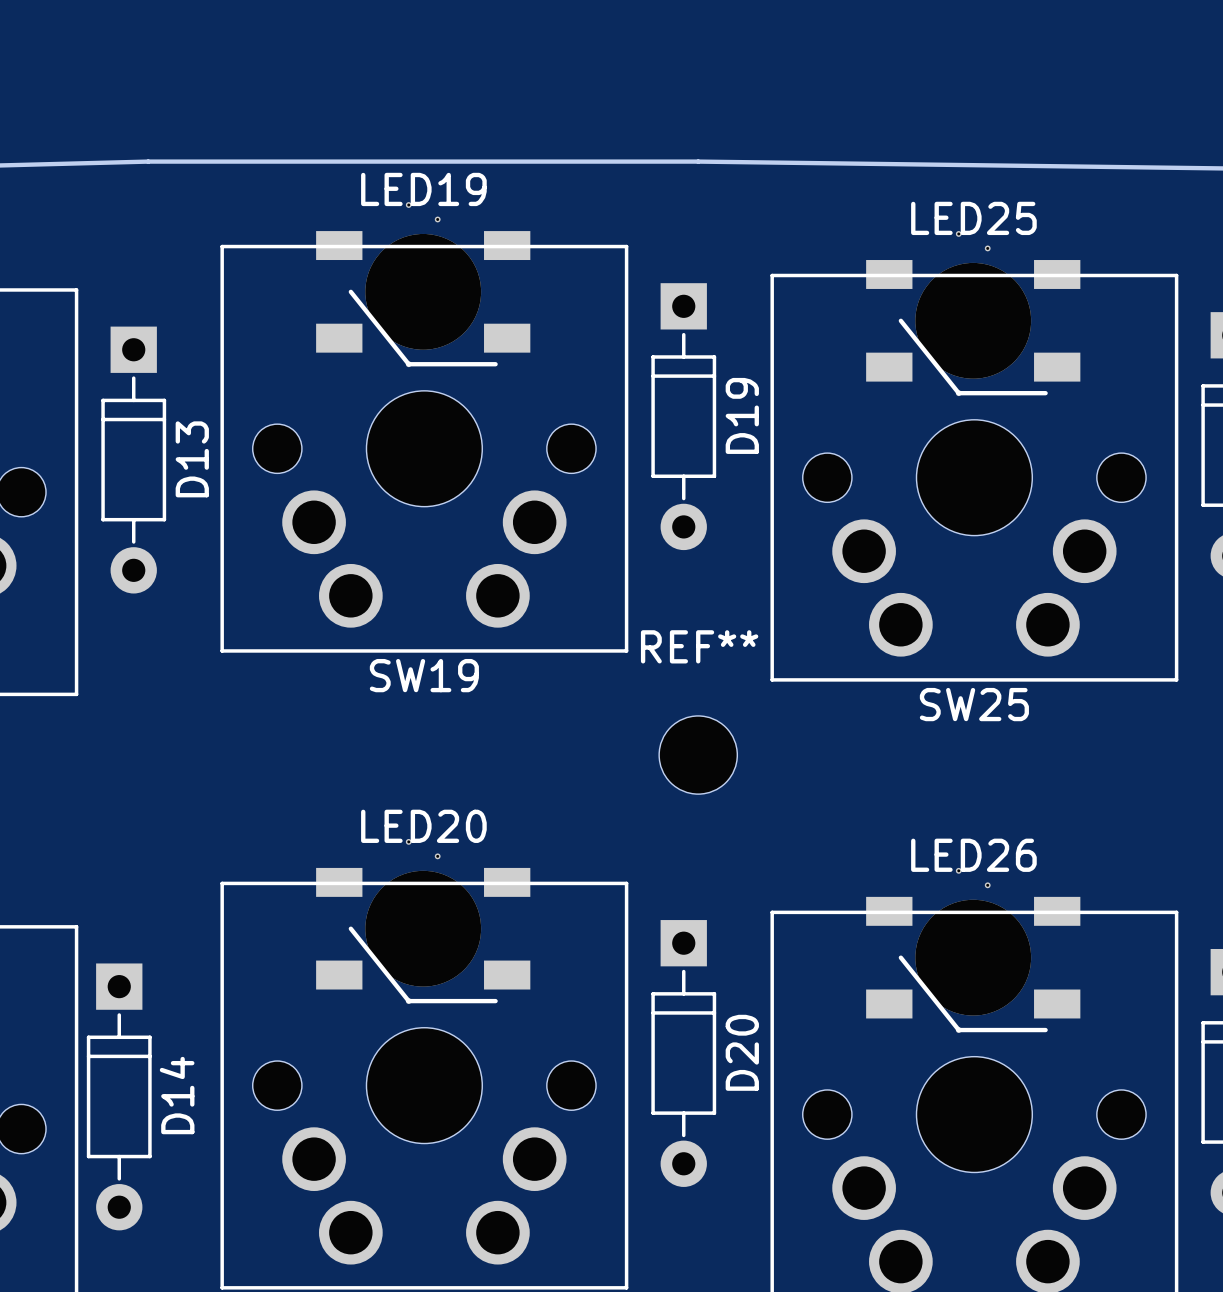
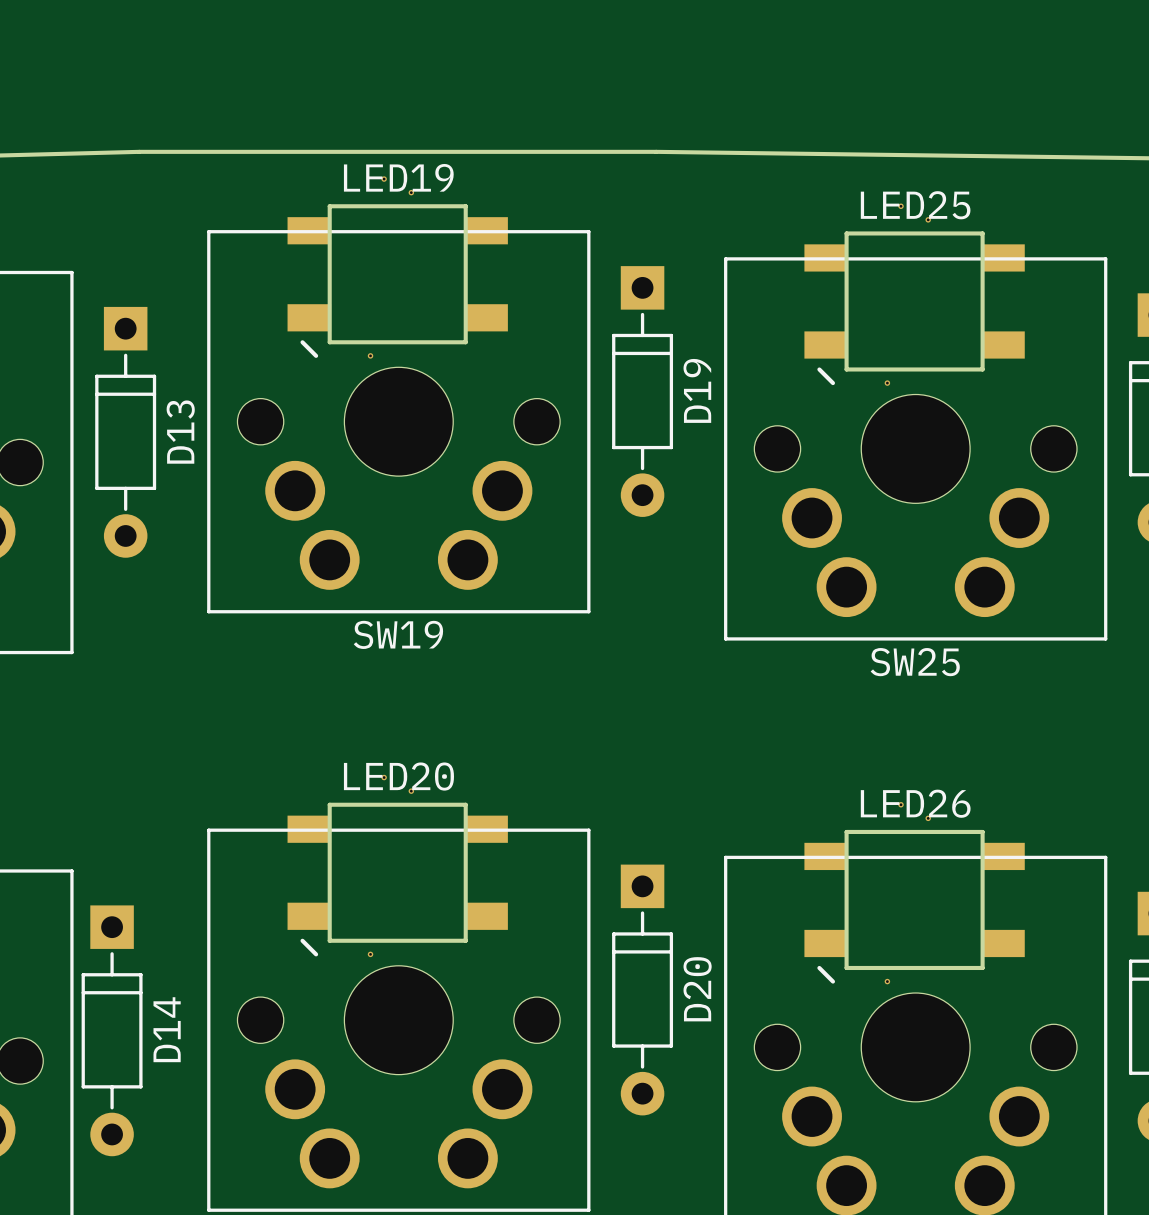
LED19 footprint: [316, 202, 531, 368] -> [287, 176, 508, 359]
board edge: none -> (329, 206) (329, 342) (465, 342) (465, 206) (329, 206)
LED25 footprint: [866, 231, 1081, 397] -> [804, 203, 1025, 386]
board edge: none -> (846, 233) (846, 369) (982, 369) (982, 233) (846, 233)
REF**: (698, 755) -> none
LED20 footprint: [316, 838, 531, 1004] -> [287, 774, 508, 958]
board edge: none -> (329, 804) (329, 940) (465, 940) (465, 804) (329, 804)
LED26 footprint: [866, 867, 1081, 1033] -> [804, 802, 1025, 985]
board edge: none -> (846, 831) (846, 967) (982, 967) (982, 831) (846, 831)

